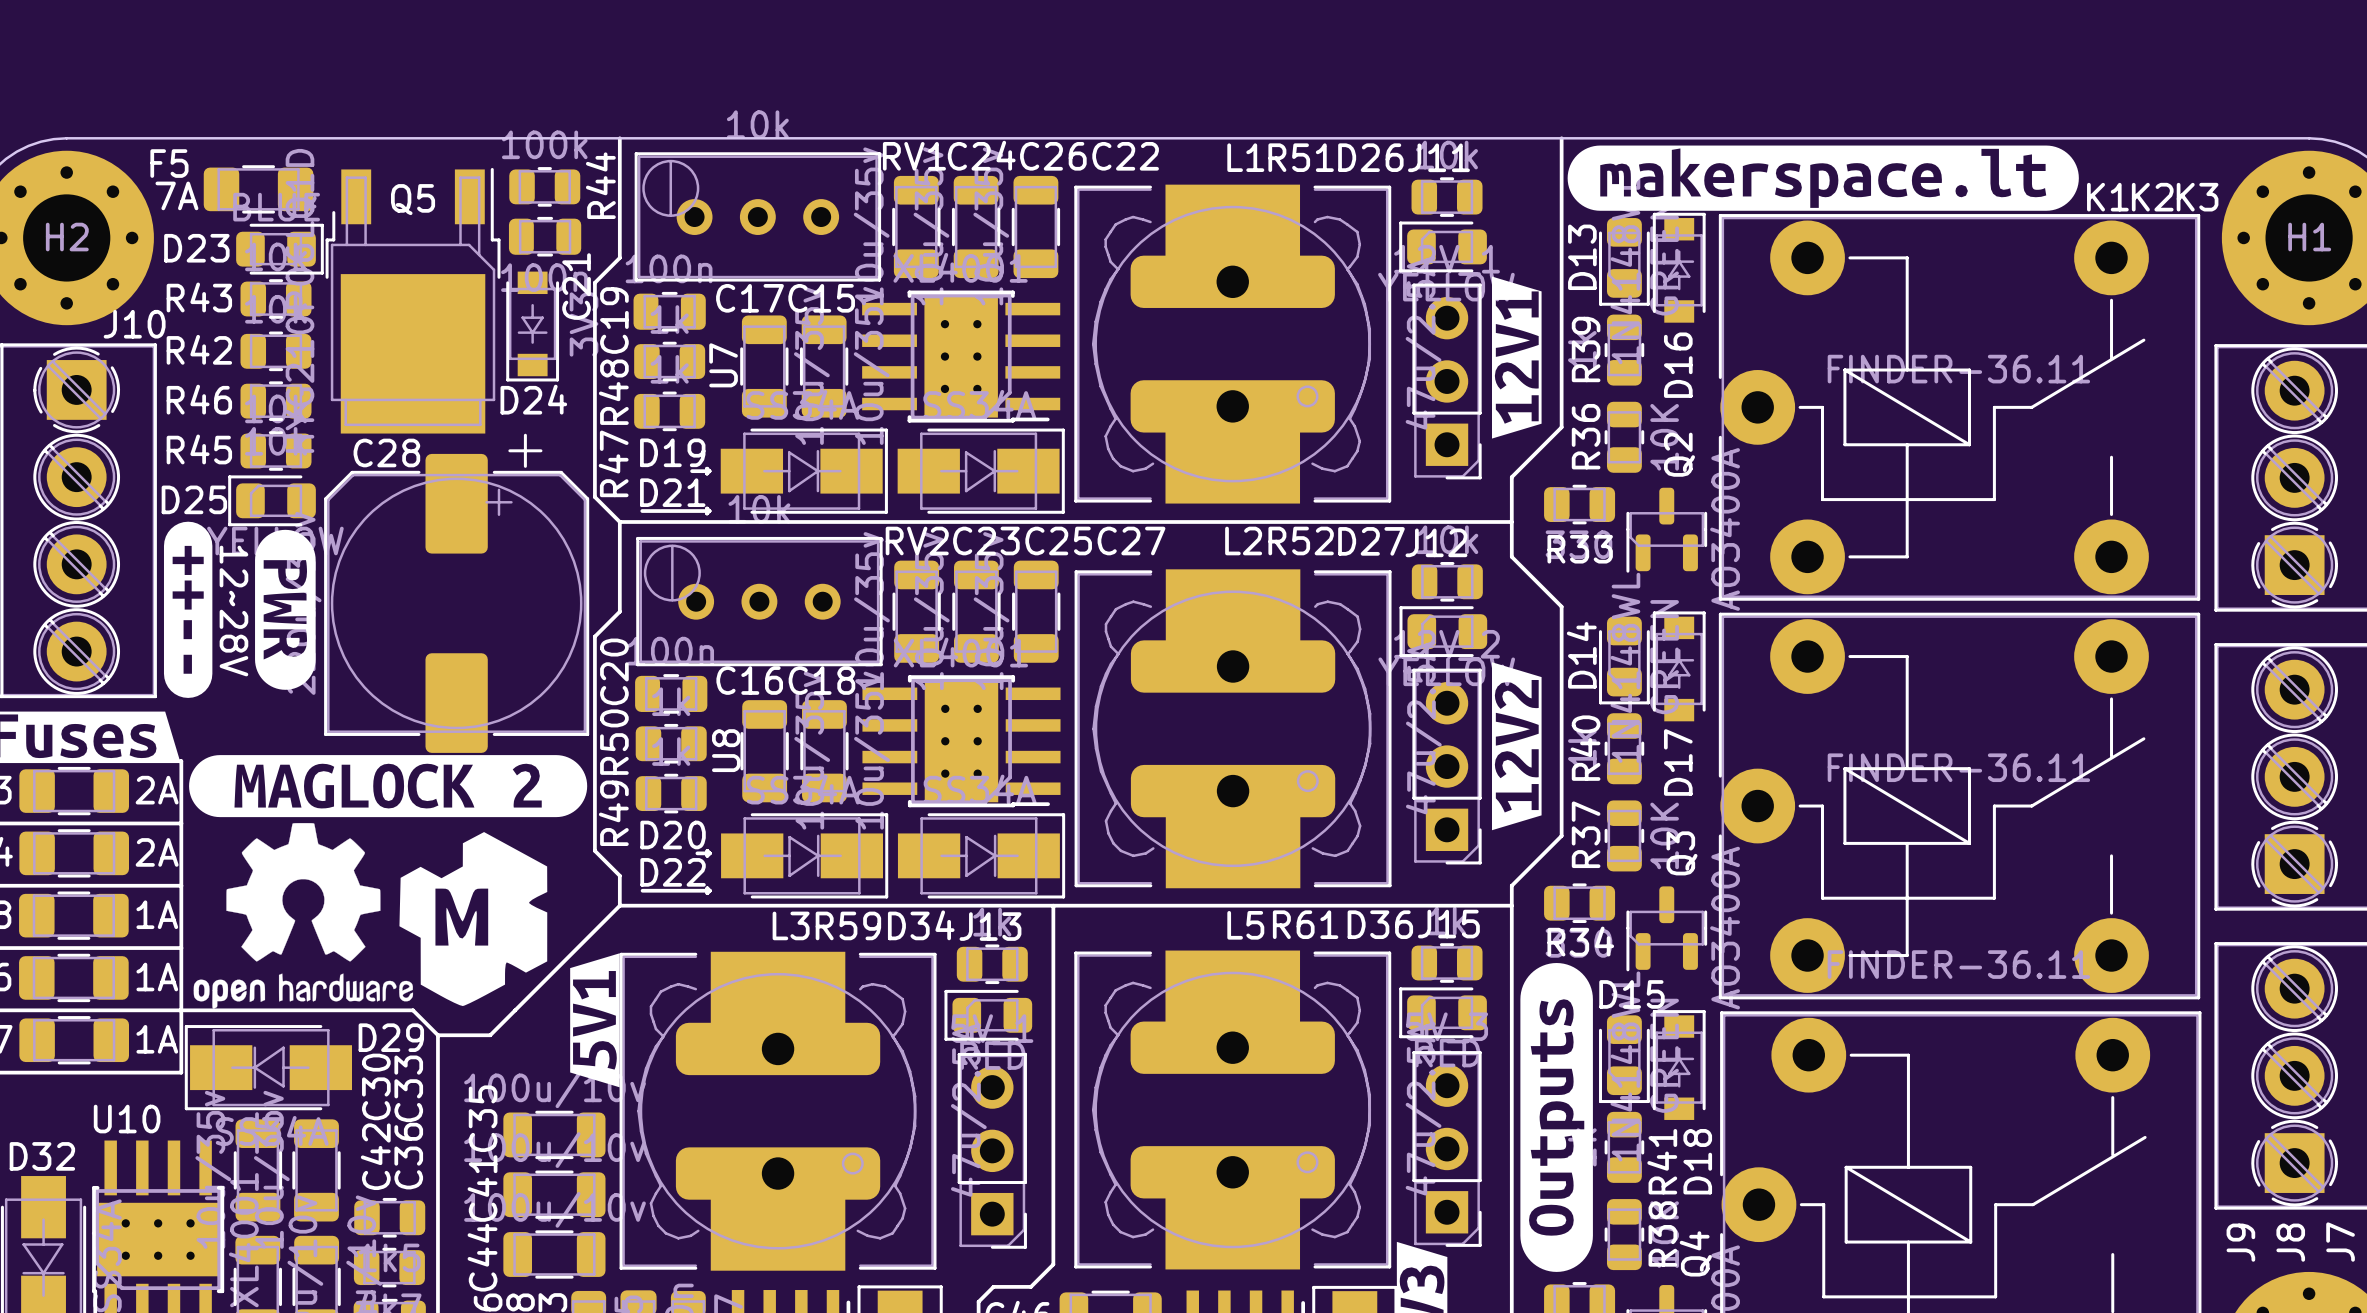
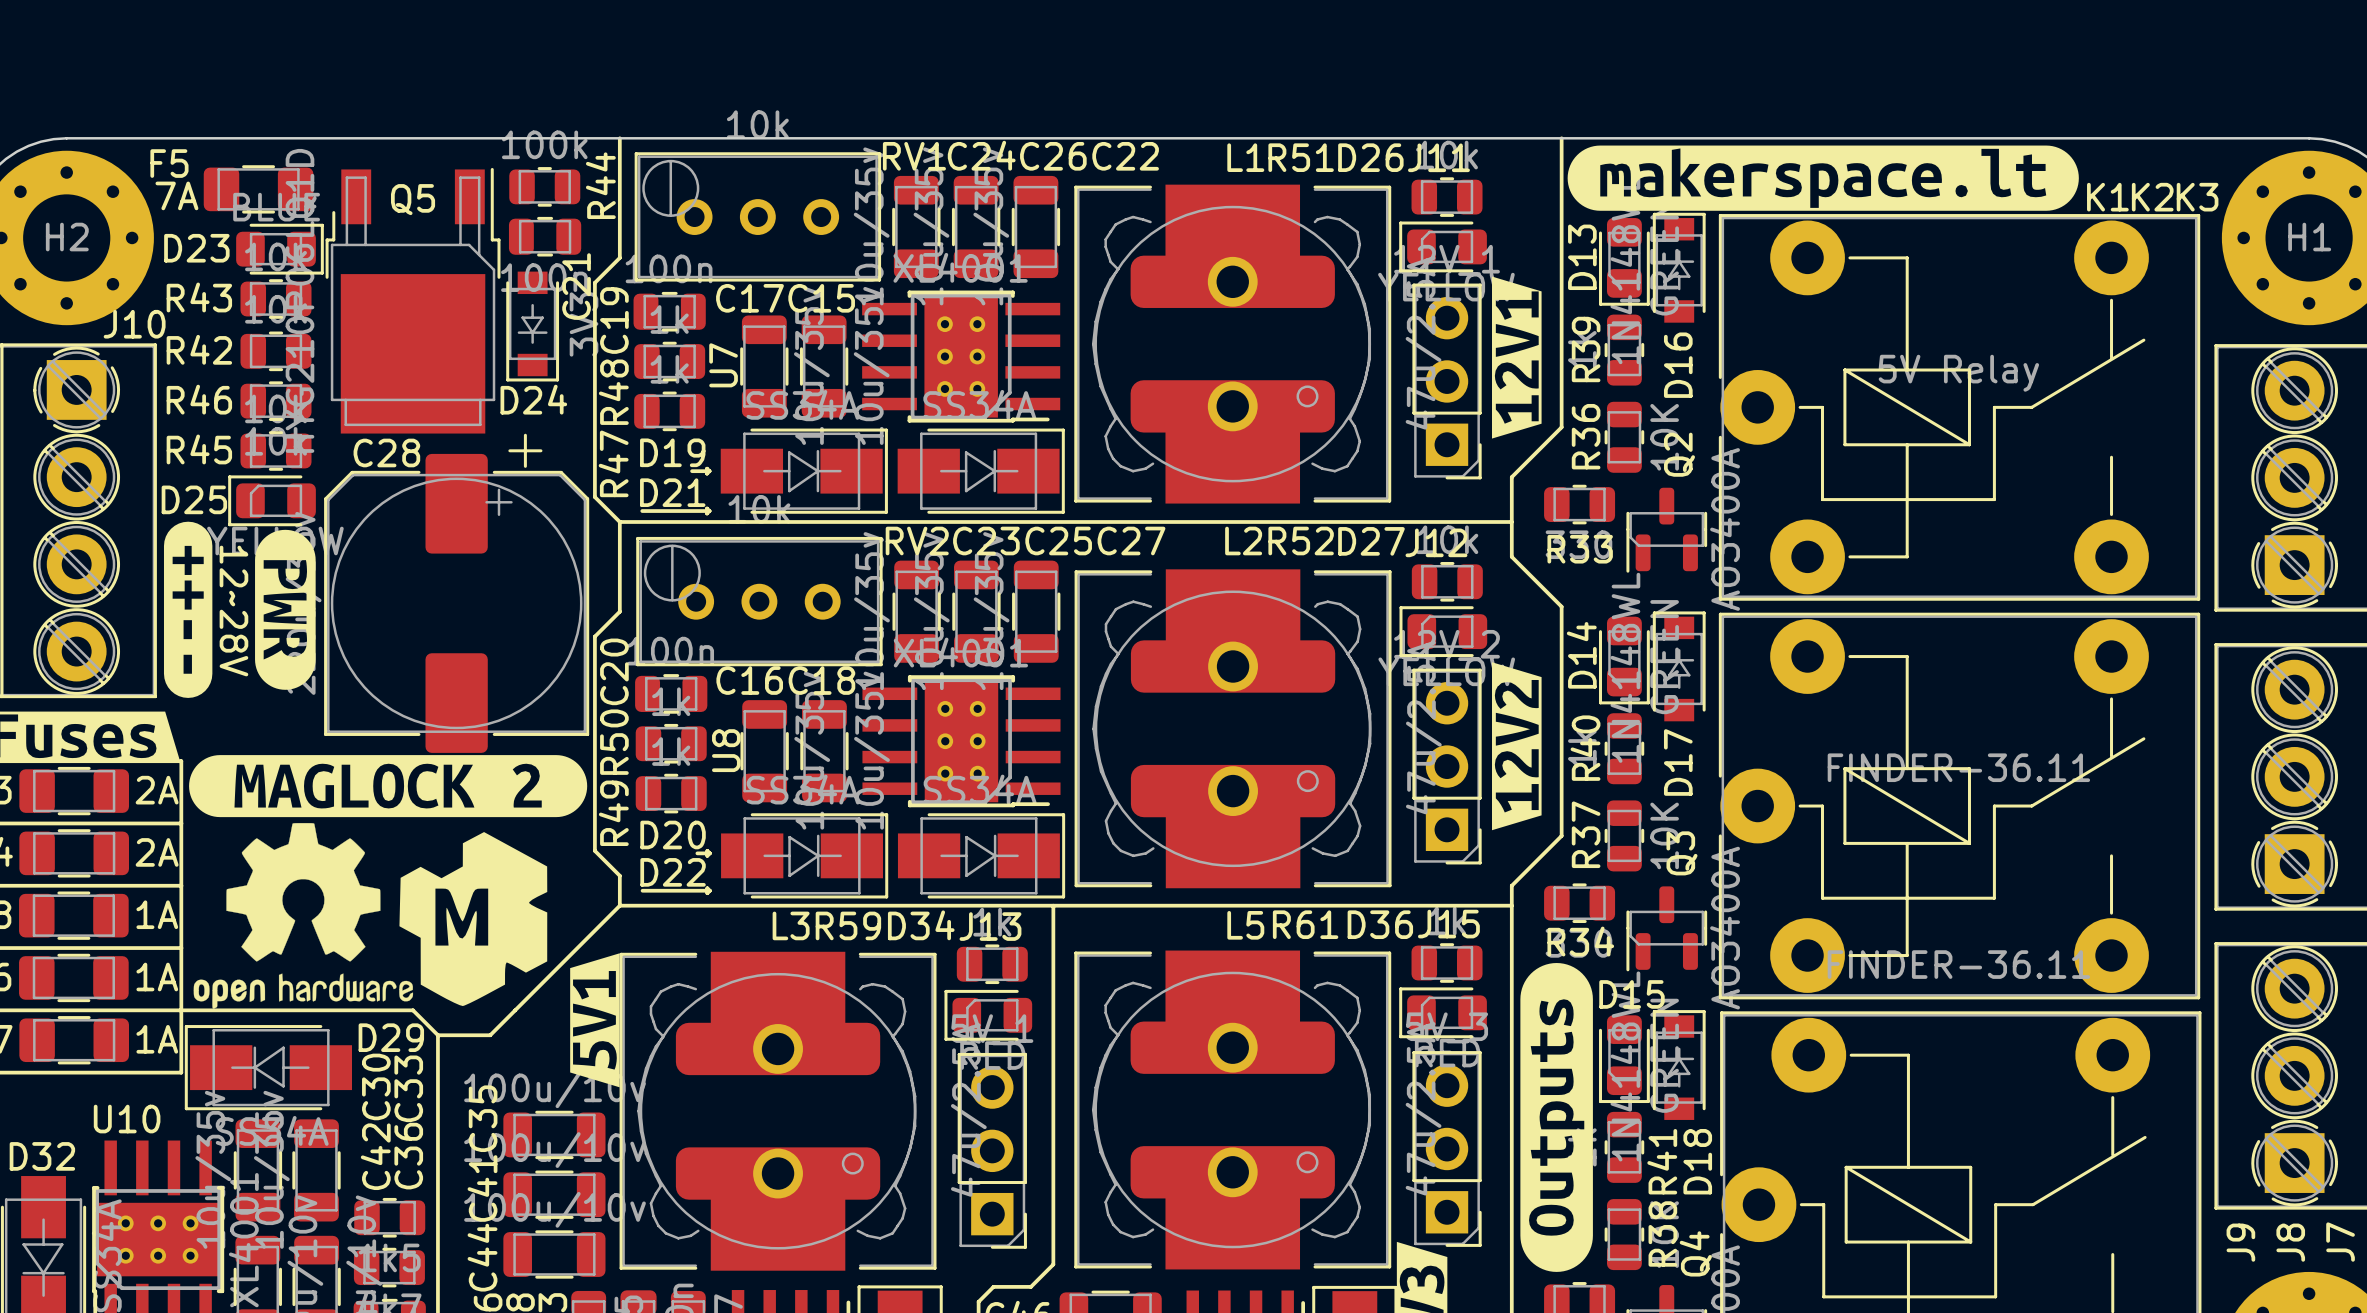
K1 value: FINDER-36.11 (1958, 369) -> 5V Relay (1958, 373)

